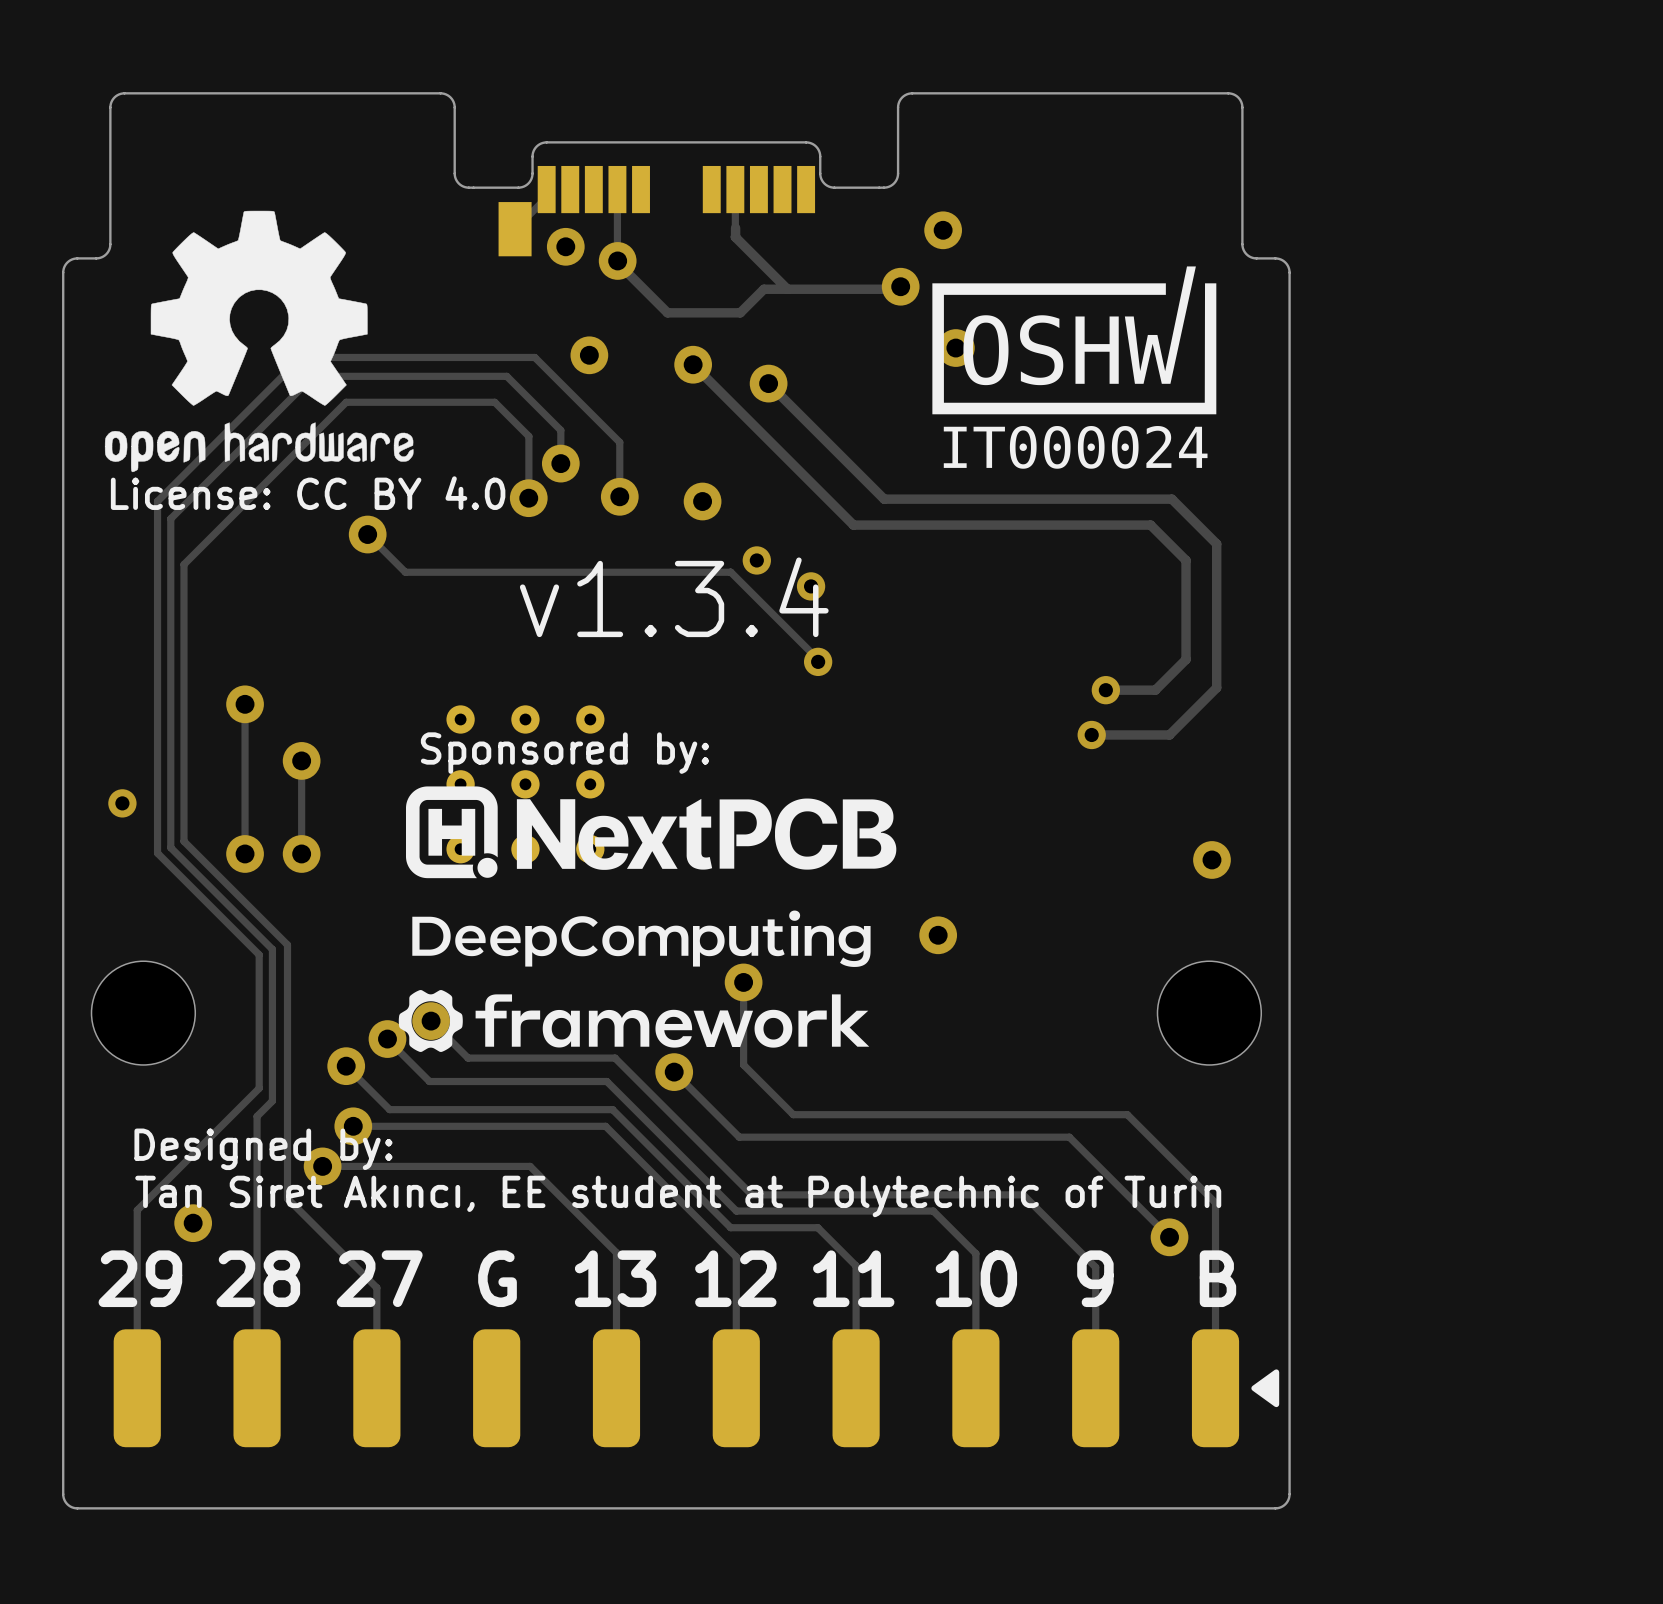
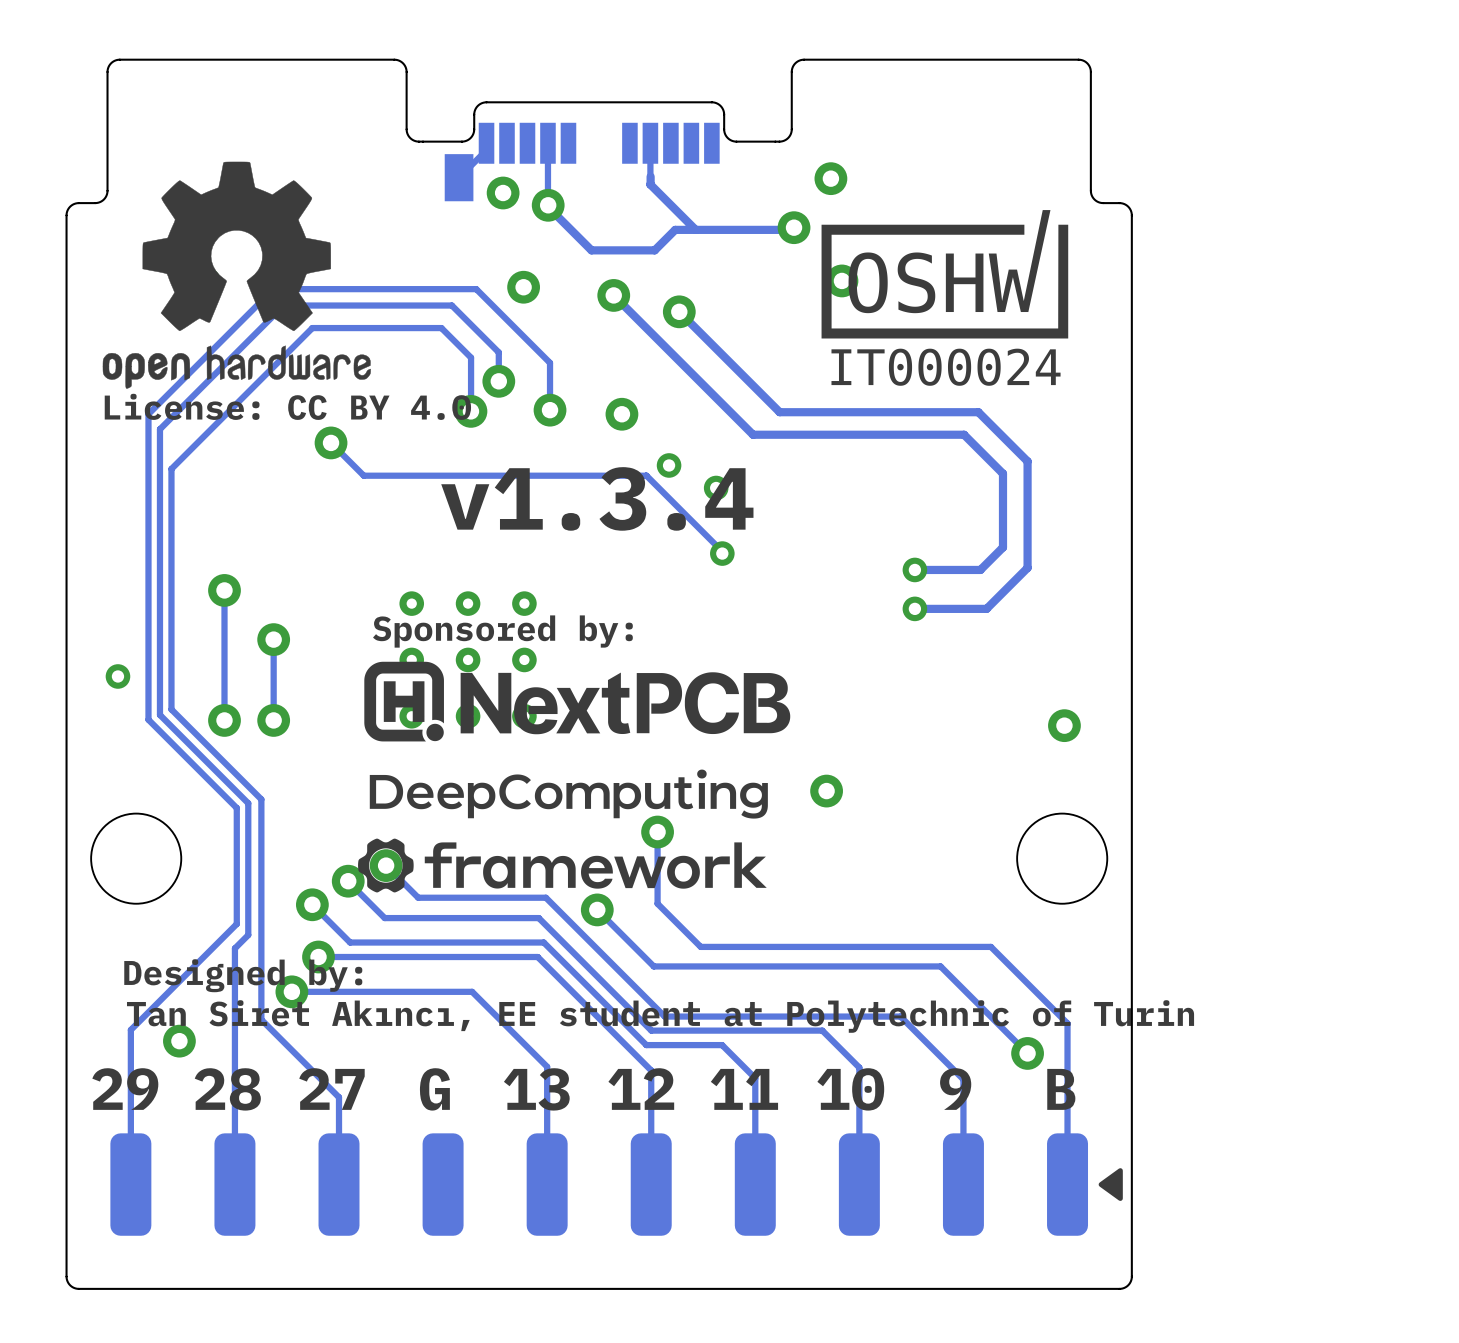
track: (1112, 499) (1171, 499) (1216, 543) (1216, 687) (1169, 734) (1091, 734) -> (978, 412) (1027, 461) (1027, 567) (986, 608) (914, 608)
track: (1096, 525) (1150, 525) (1186, 560) (1186, 659) (1155, 690) (1105, 690) -> (964, 434) (1002, 473) (1002, 547) (980, 569) (914, 569)
via: none -> (914, 569)
via: (1105, 690) -> none
via: none -> (914, 608)
via: (1091, 734) -> none

